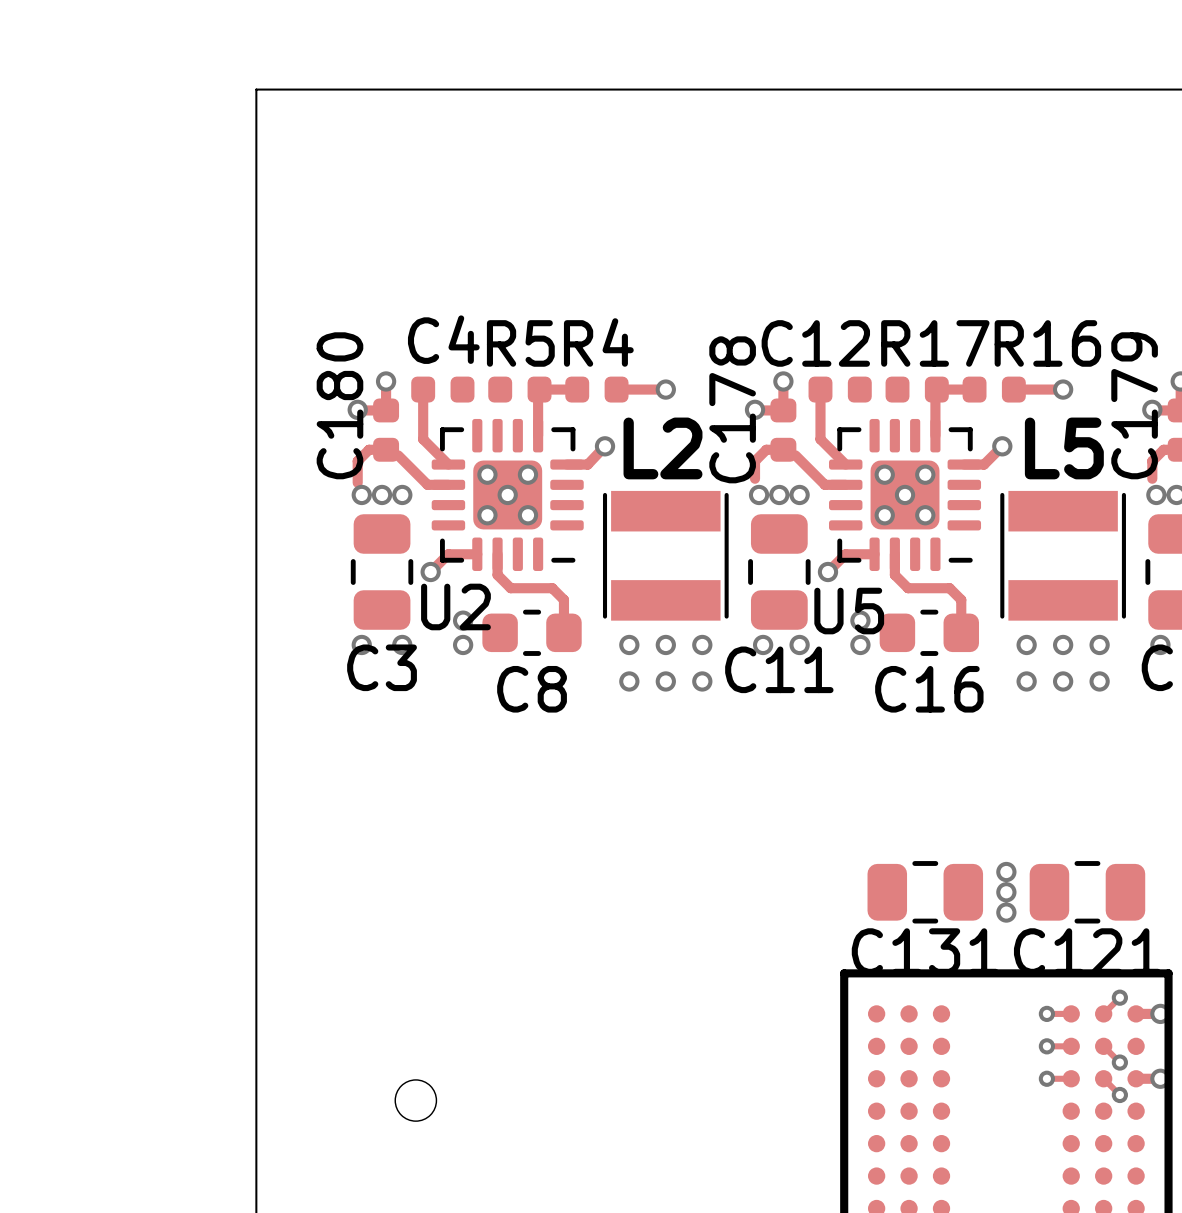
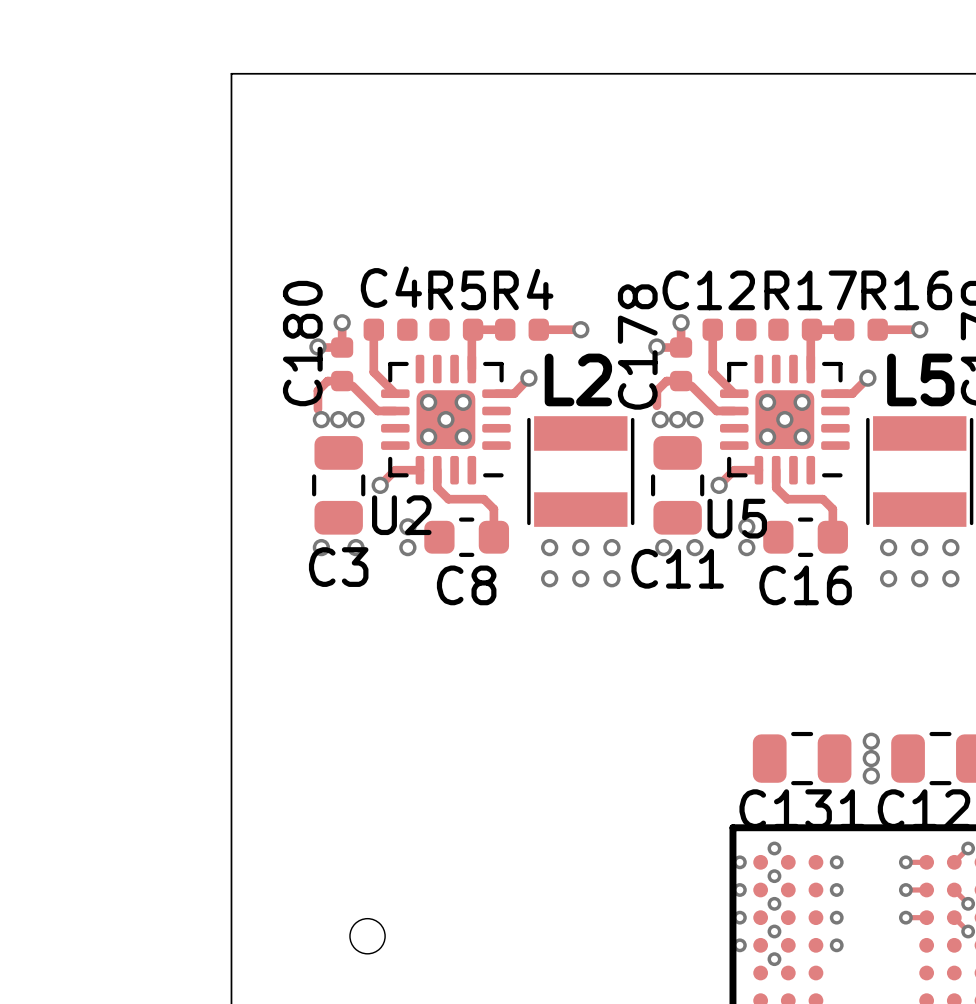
via: none -> (774, 848)
via: none -> (739, 862)
via: none -> (836, 862)
via: none -> (774, 876)
via: none -> (739, 889)
via: none -> (836, 889)
via: none -> (774, 903)
via: none -> (739, 917)
via: none -> (836, 917)
via: none -> (774, 931)
via: none -> (739, 945)
via: none -> (836, 945)
via: none -> (774, 959)

